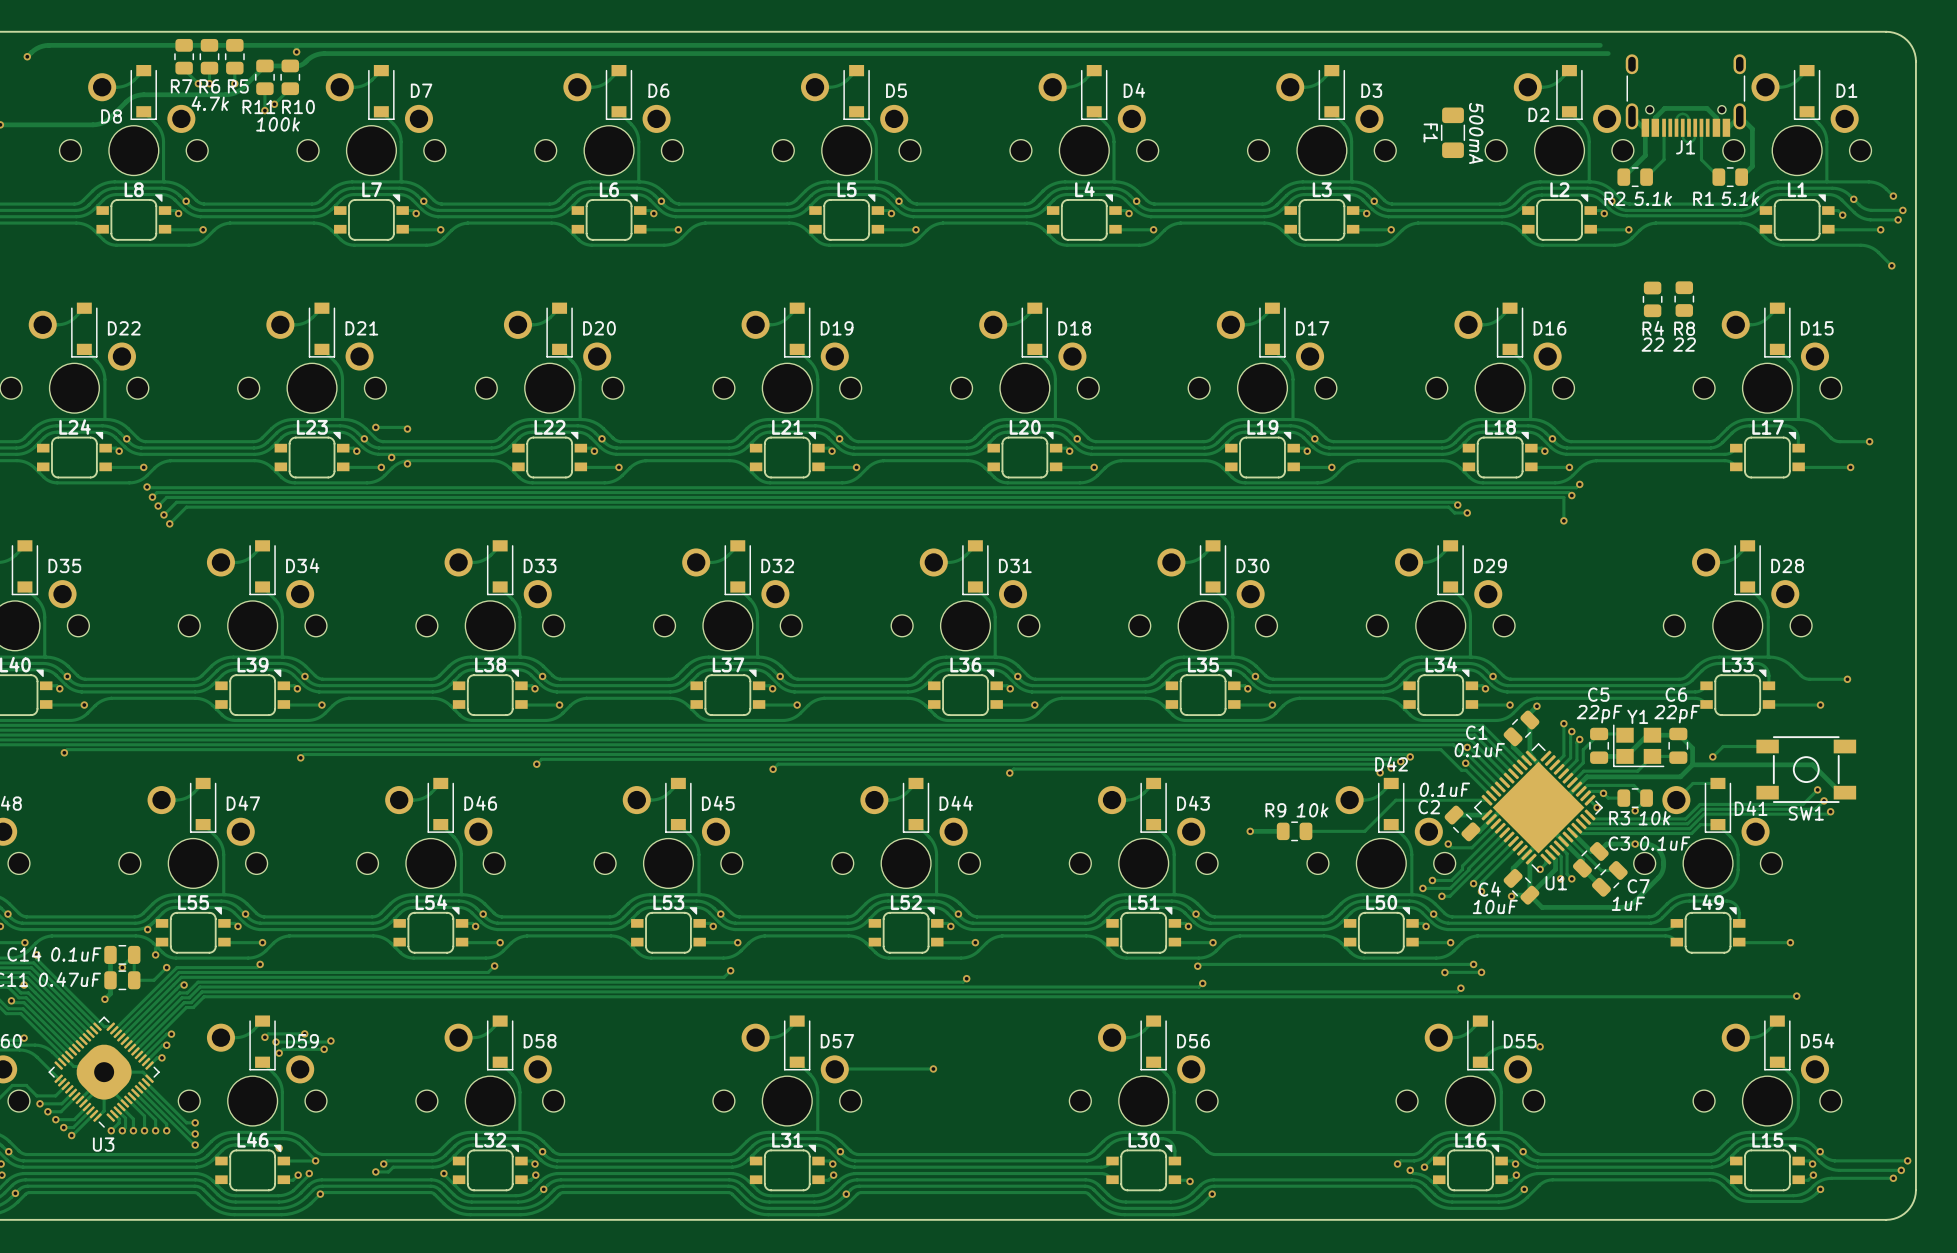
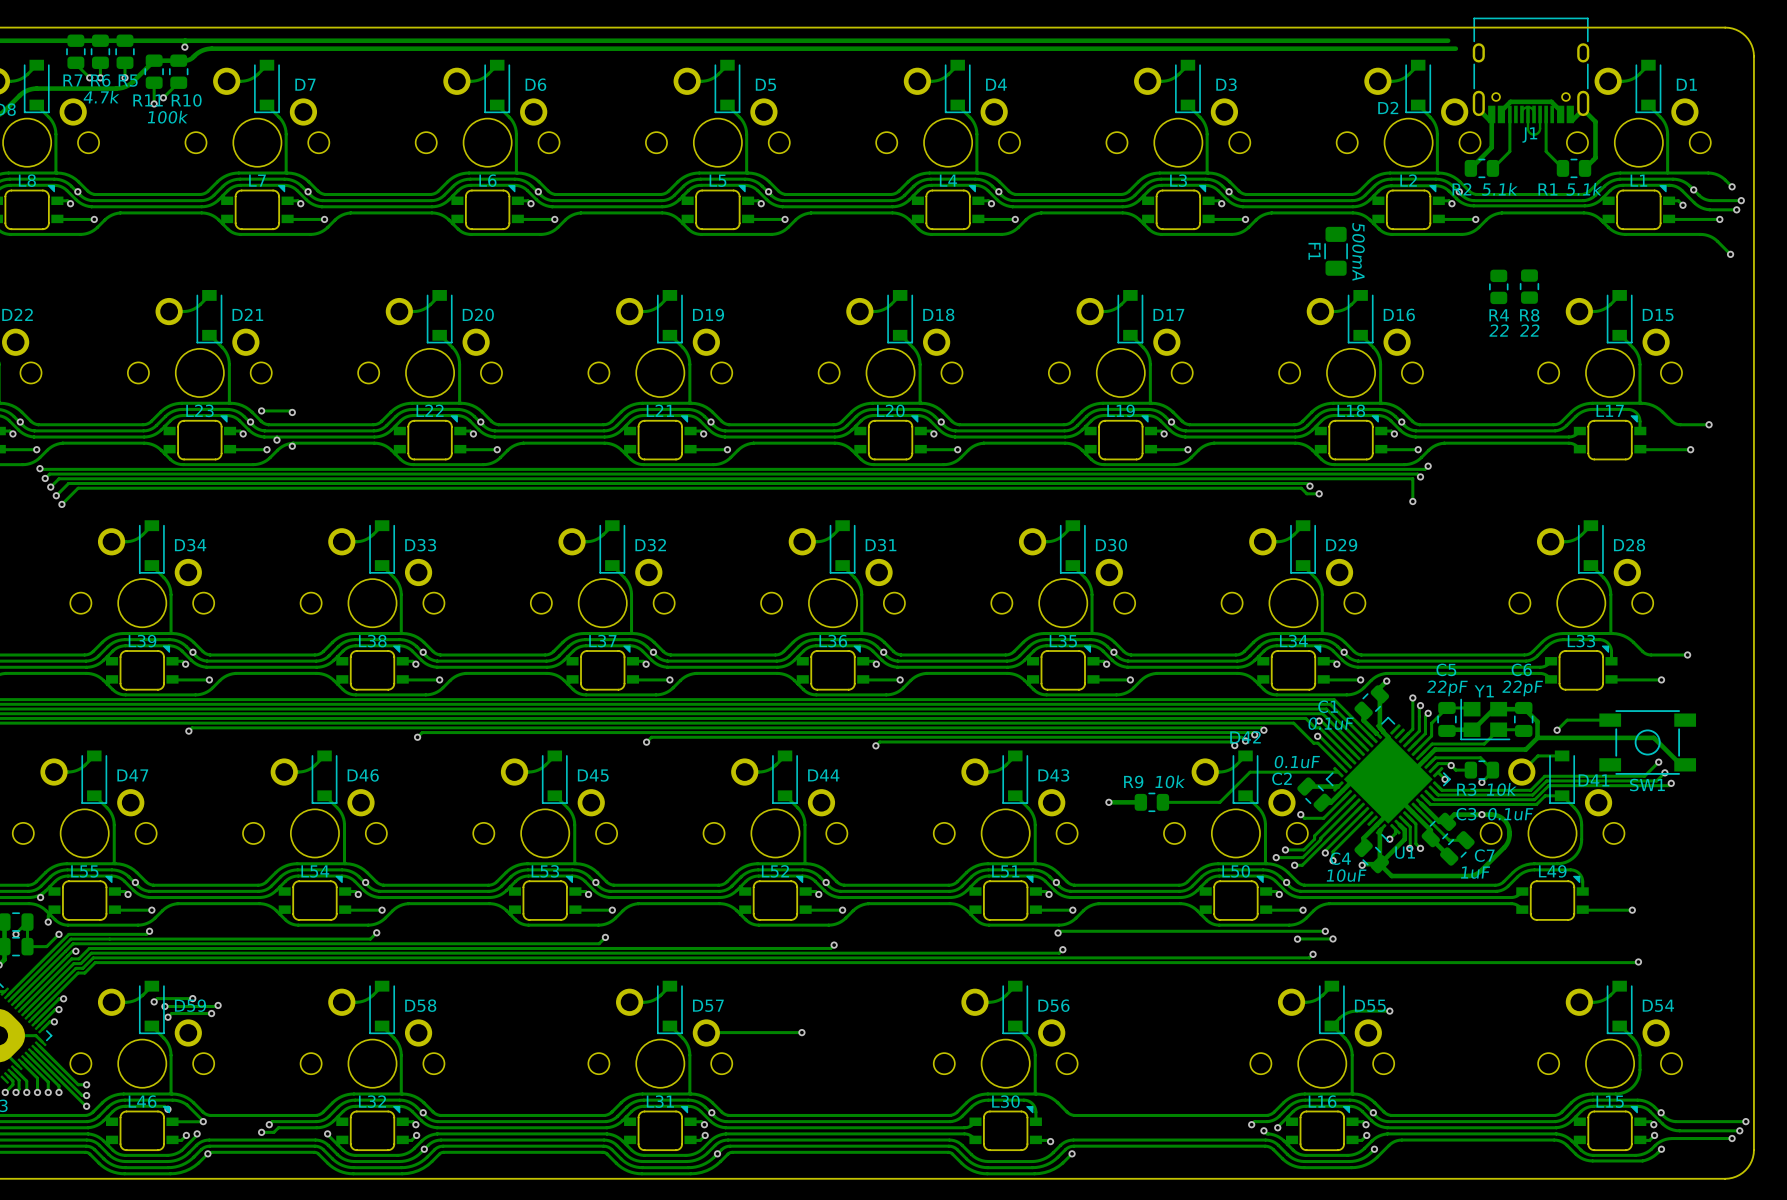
J1 footprint: [1625, 54, 1746, 137] -> [1472, 17, 1590, 124]
F1 position: (1453, 132) -> (1336, 251)

